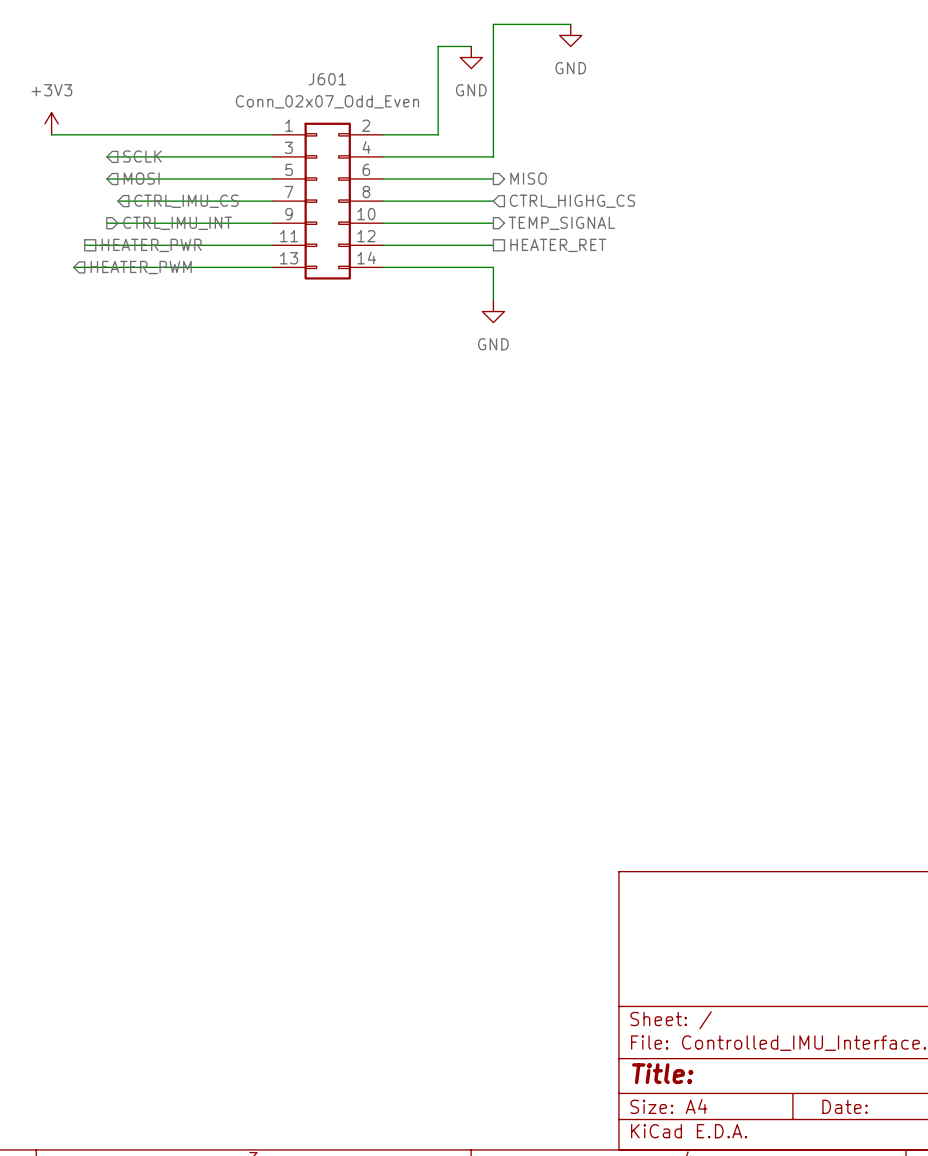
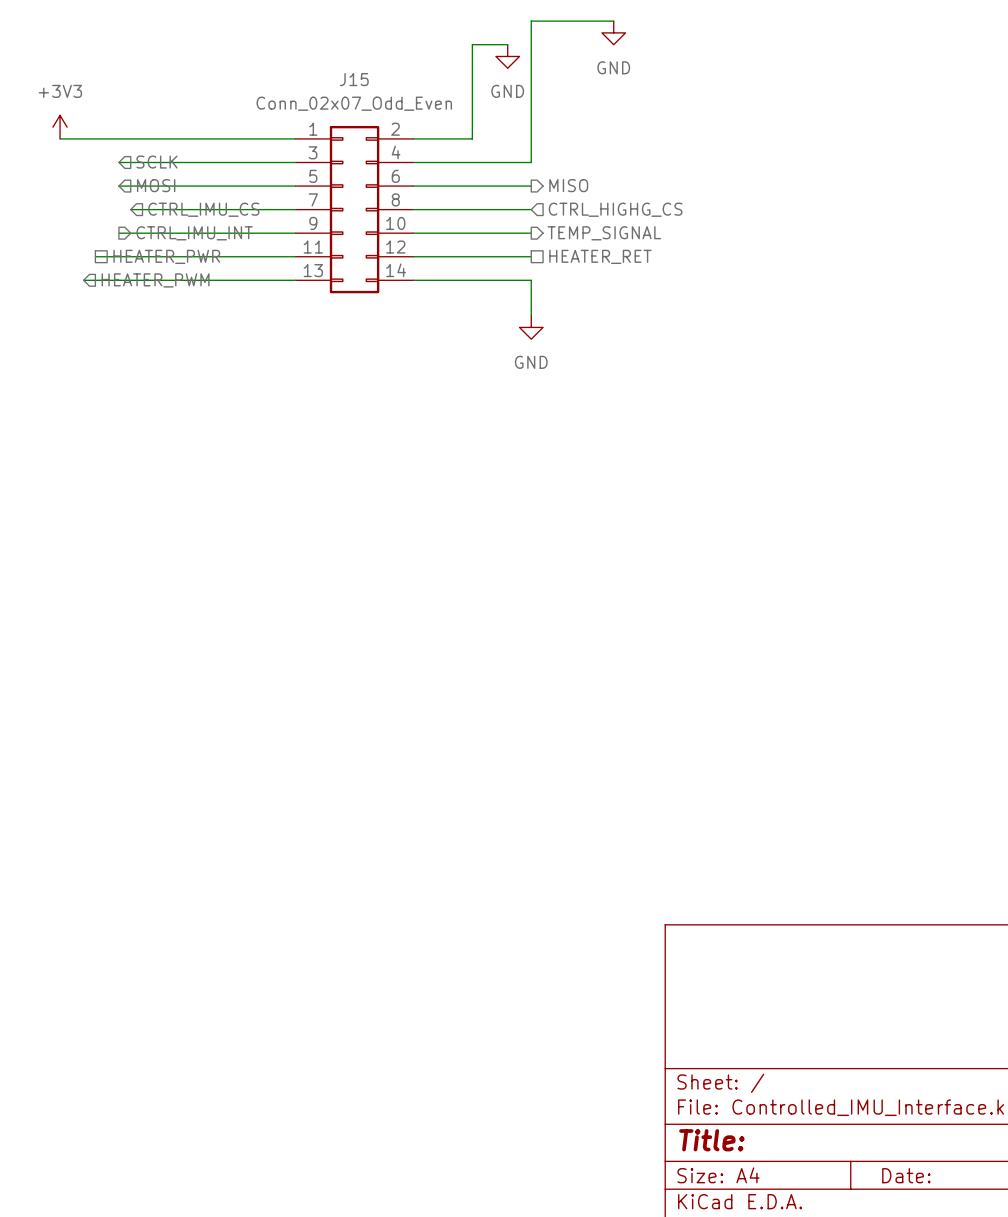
J601 name: J601 (327, 79) -> J15 (354, 79)

